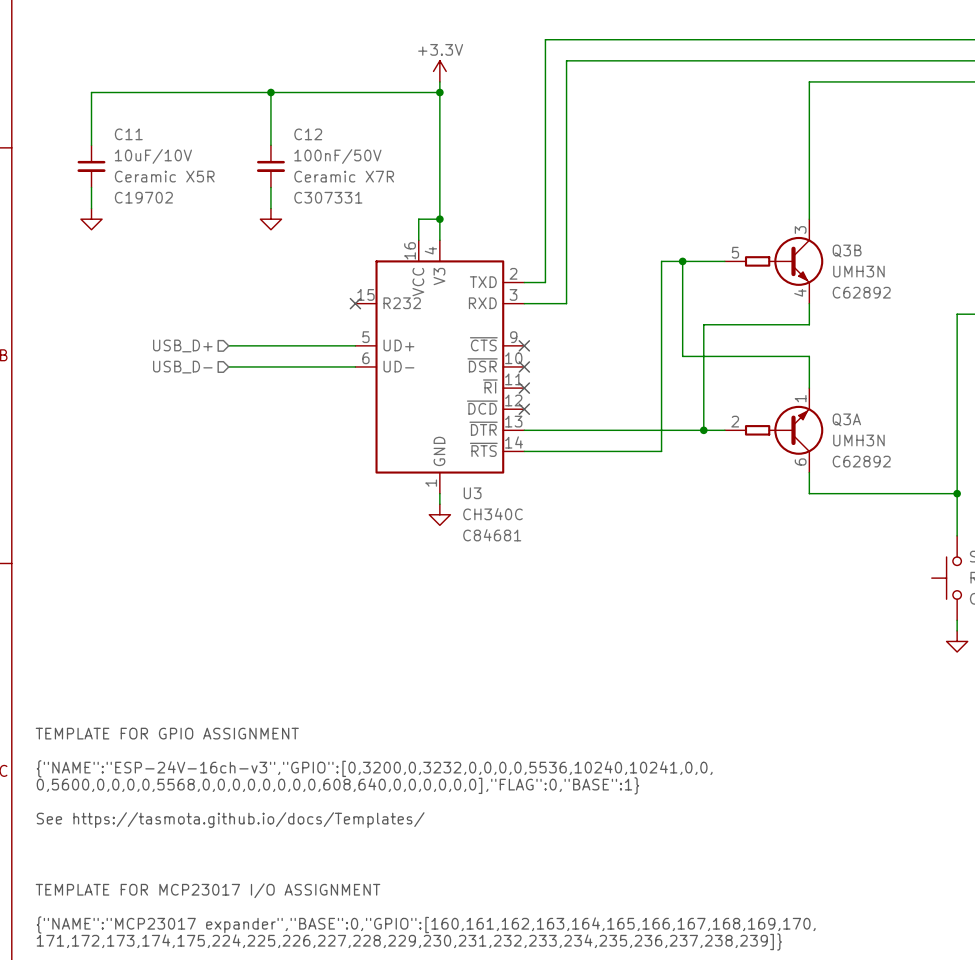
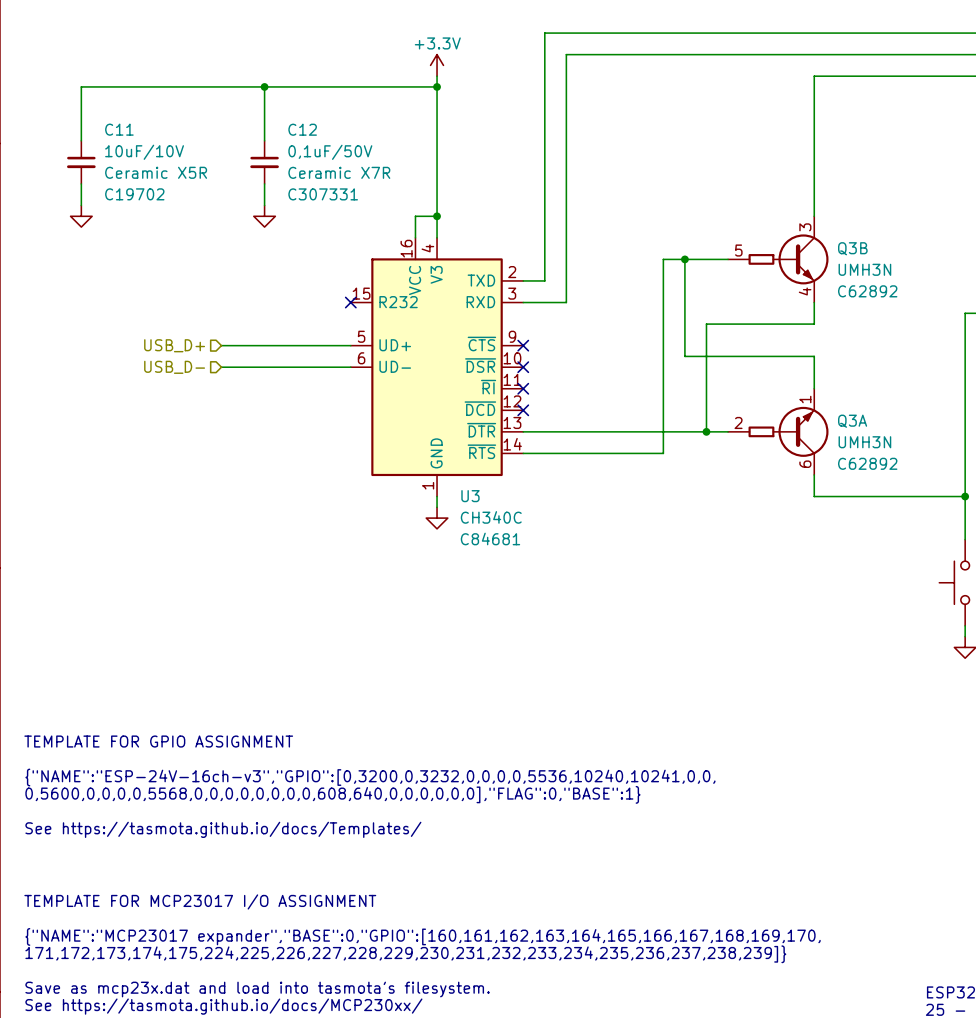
C12 value: 100nF/50V (337, 156) -> 0,1uF/50V (330, 152)

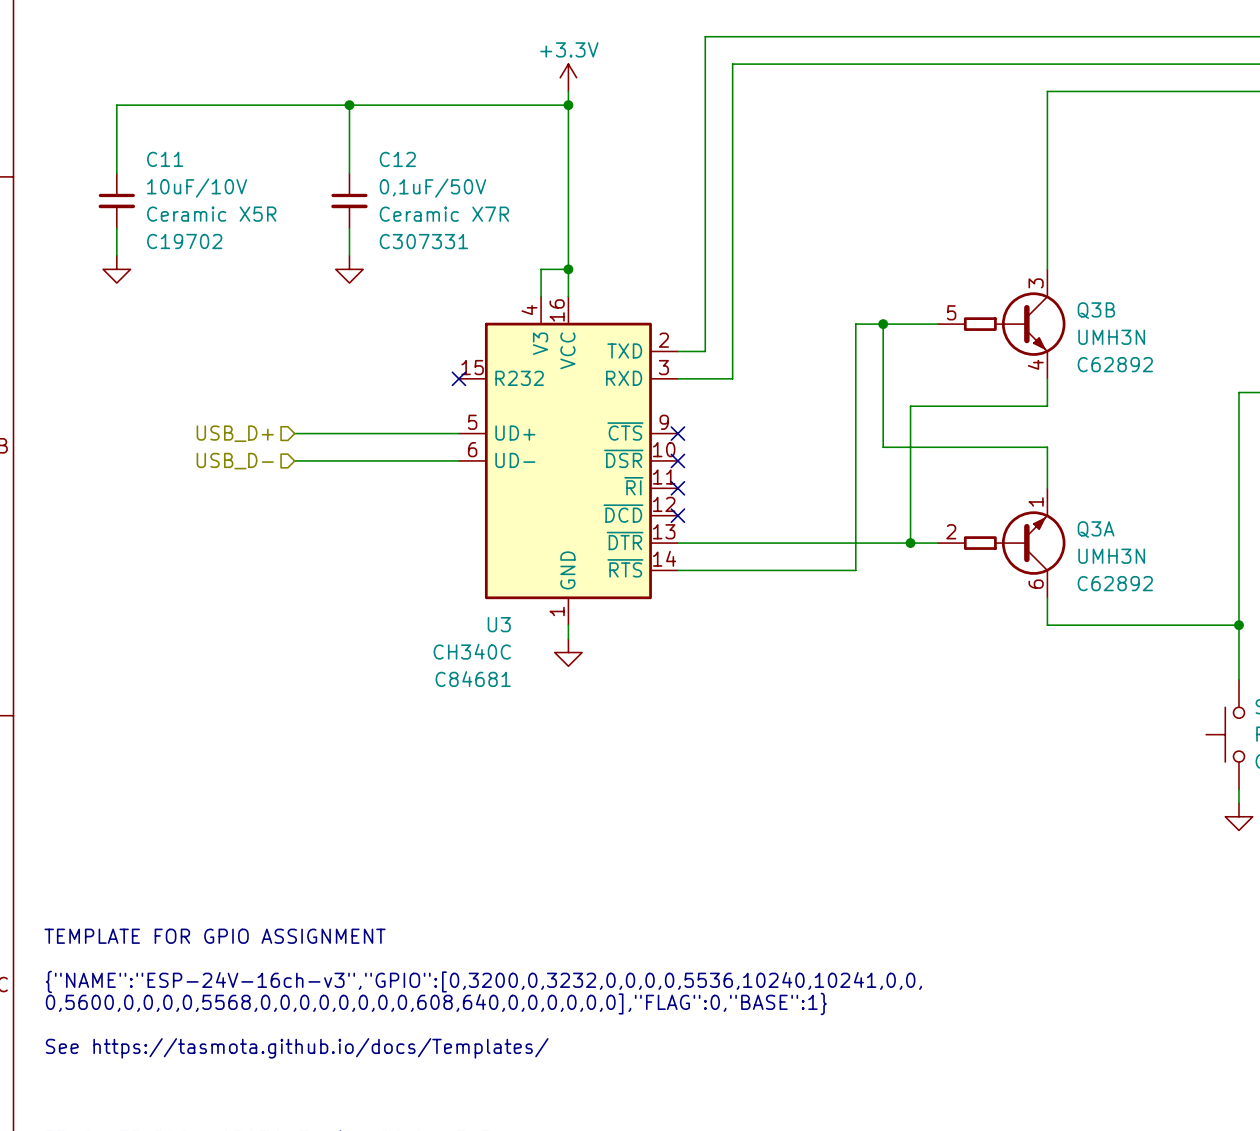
U3 pin number: 16 (406, 248) -> 4 (529, 310)
U3 pin number: 4 (427, 248) -> 16 (557, 310)
U3 pin name: V3 (436, 274) -> VCC (567, 350)
U3 pin name: VCC (415, 280) -> V3 (540, 343)
U3 name position: U3 (470, 496) -> U3 (499, 624)
U3 value position: CH340C (491, 517) -> CH340C (472, 651)
U3 text position: C84681 (490, 538) -> C84681 (473, 679)

